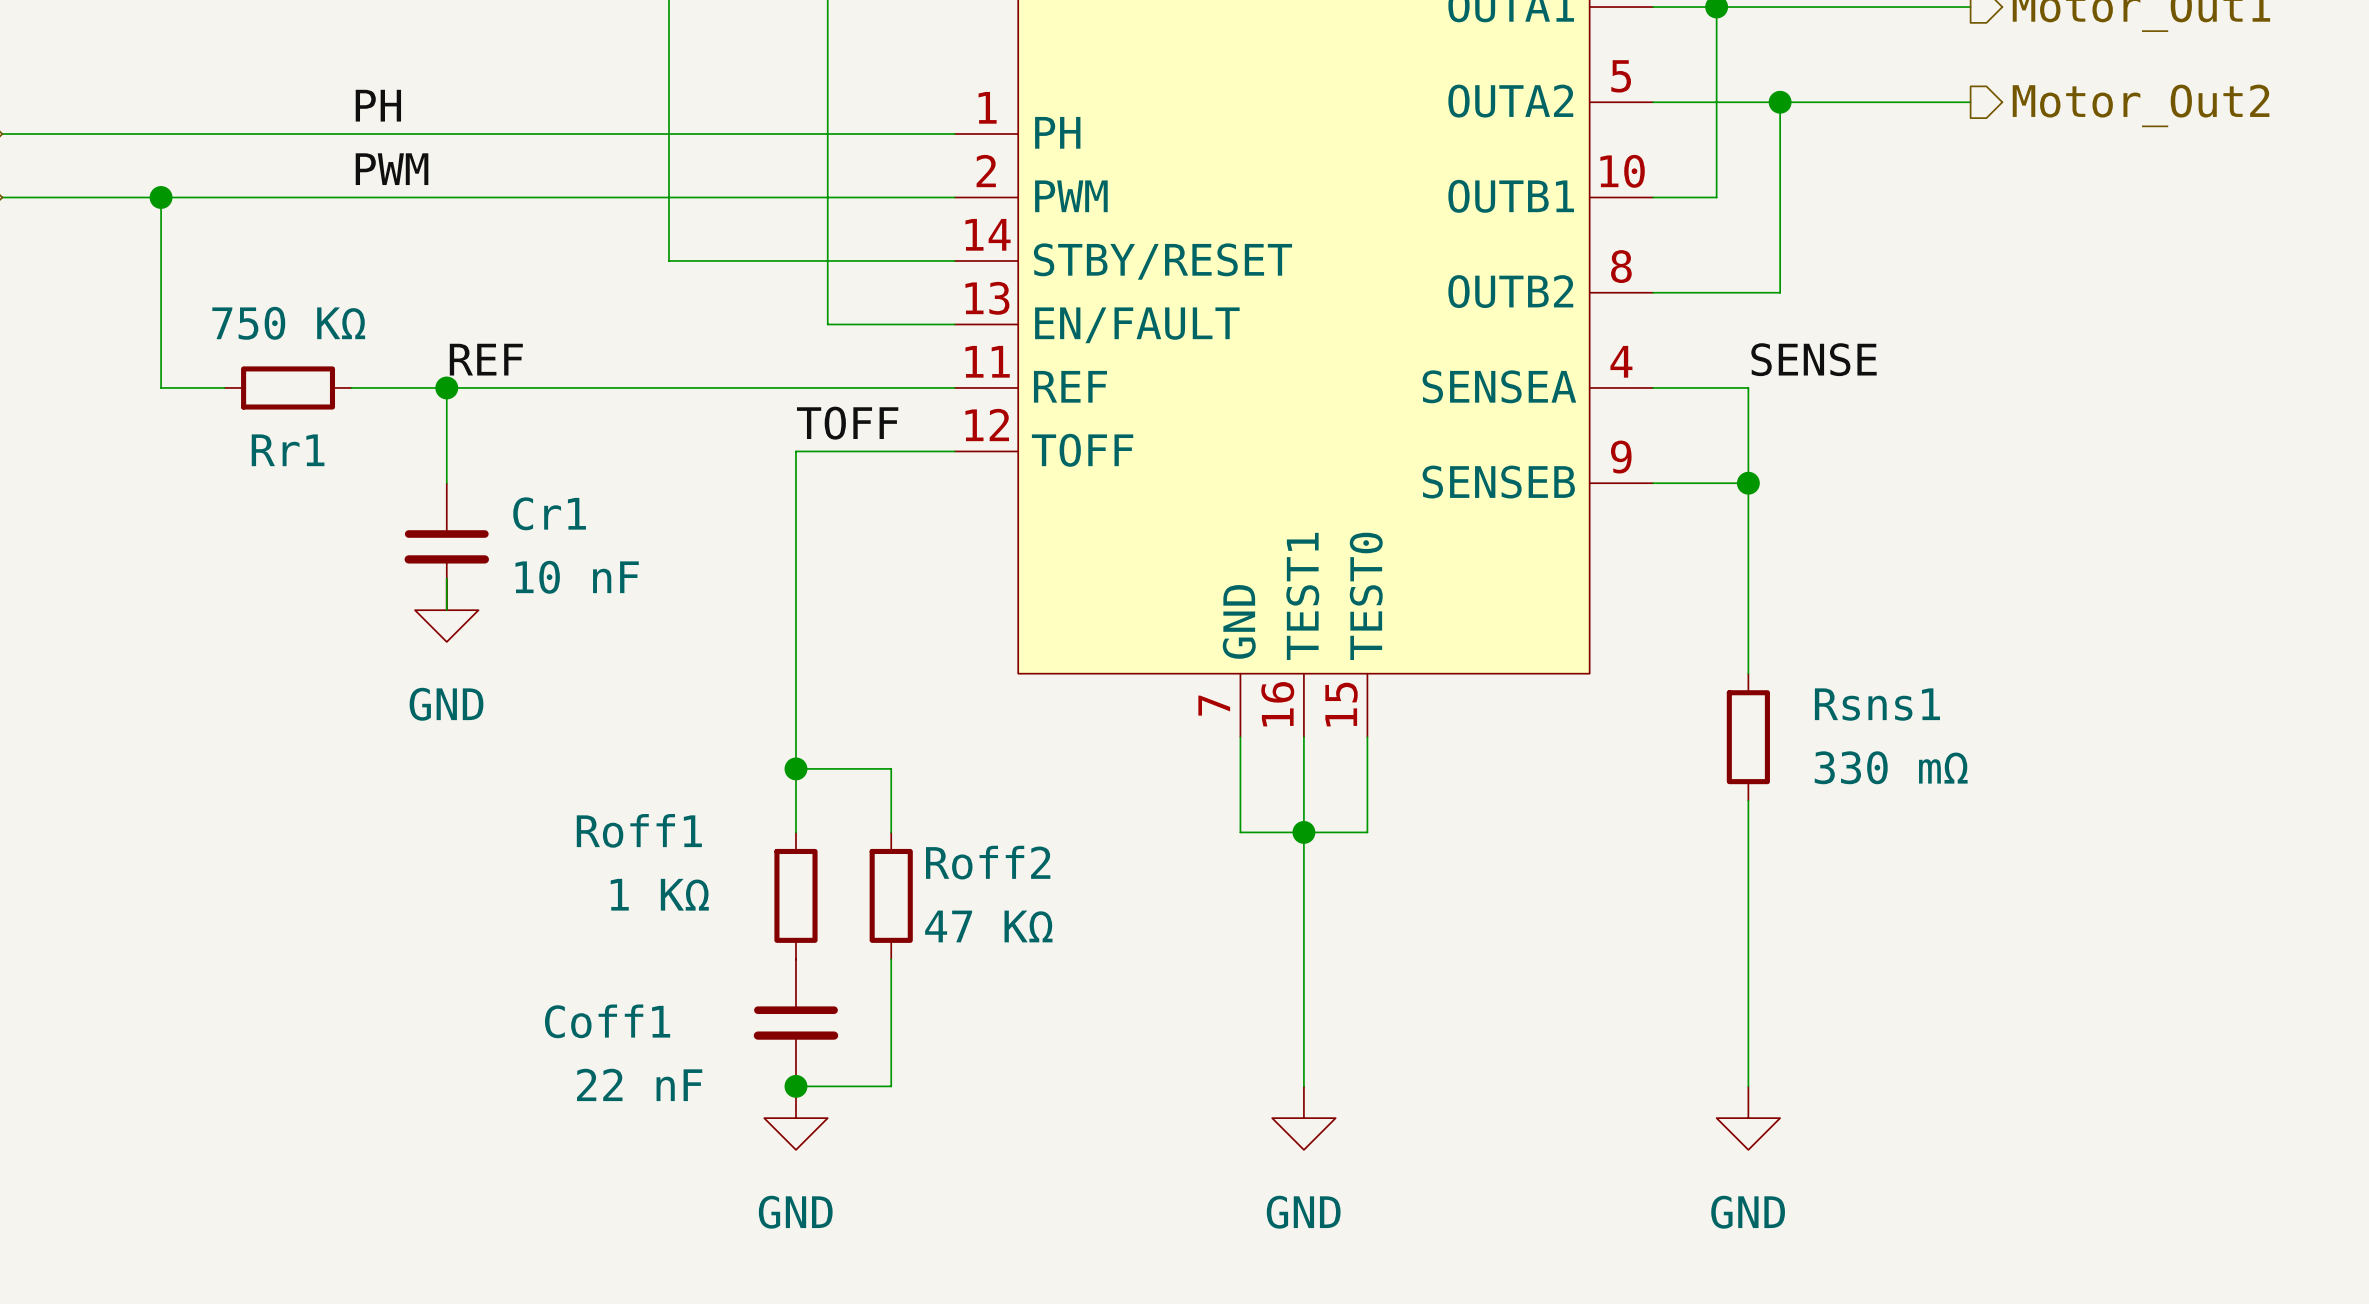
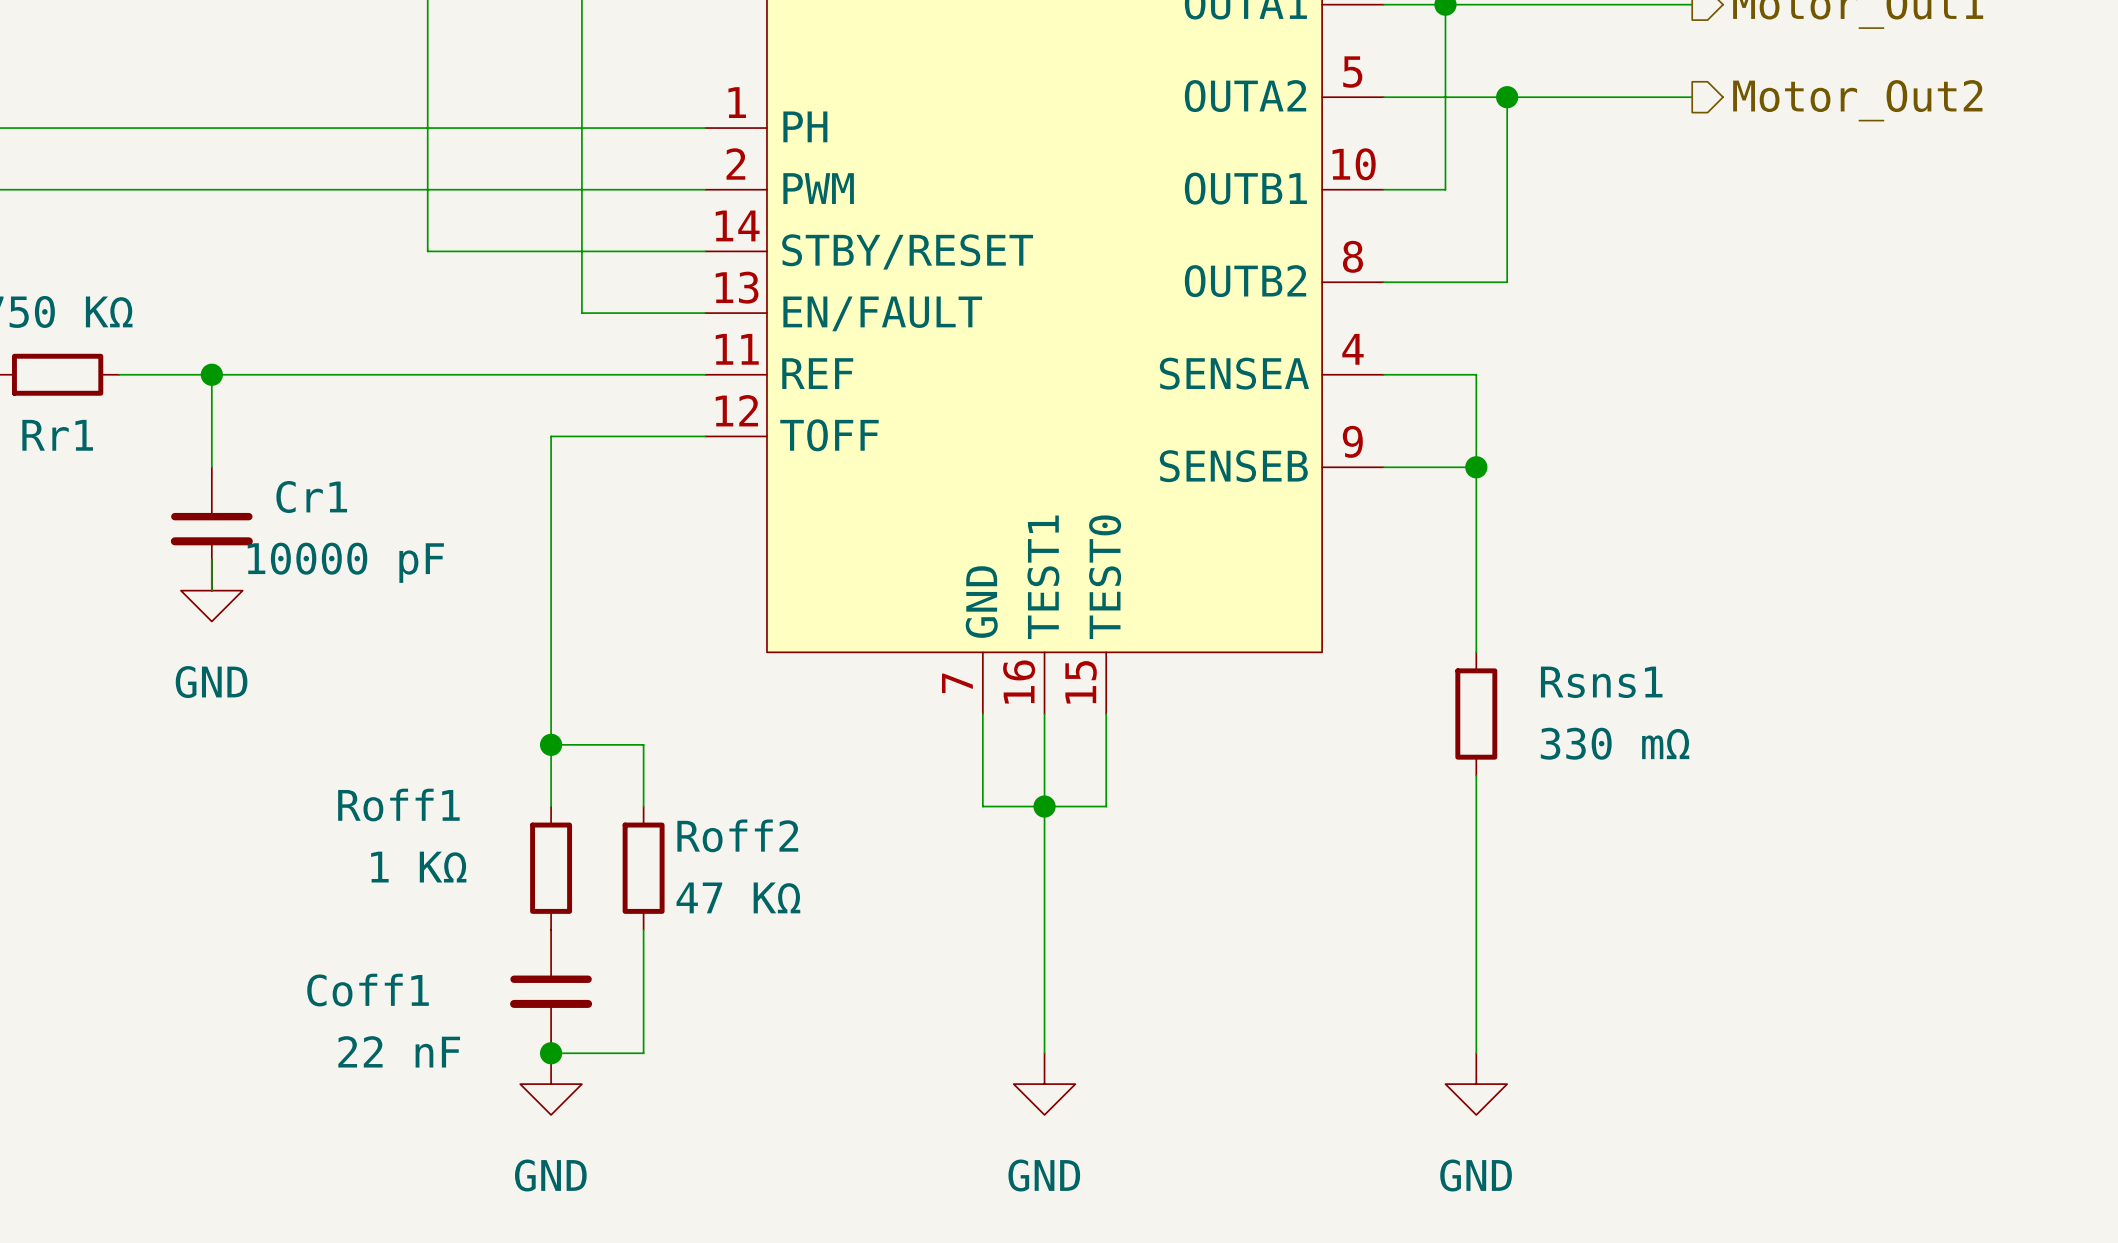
label: PH (378, 105) -> none
label: PWM (392, 169) -> none
label: REF (486, 359) -> none
label: SENSE (1814, 359) -> none
label: TOFF (847, 423) -> none
Cr1 value: 10 nF (577, 577) -> 10000 pF (345, 562)

